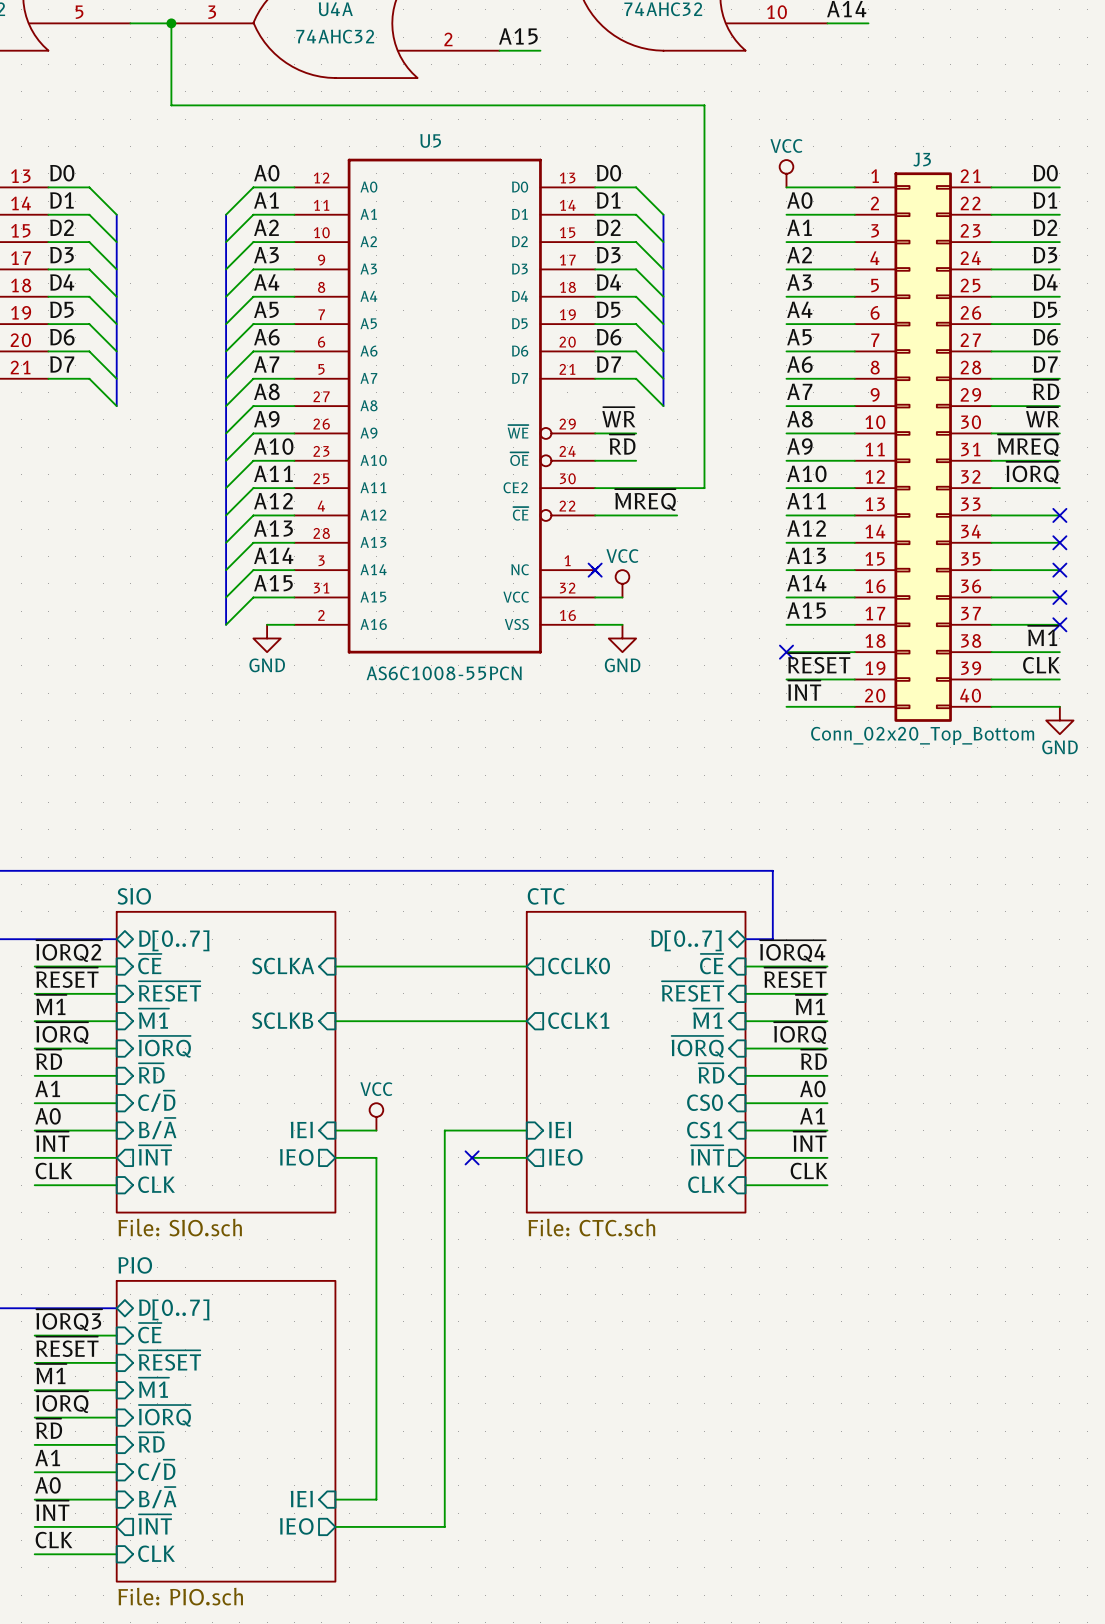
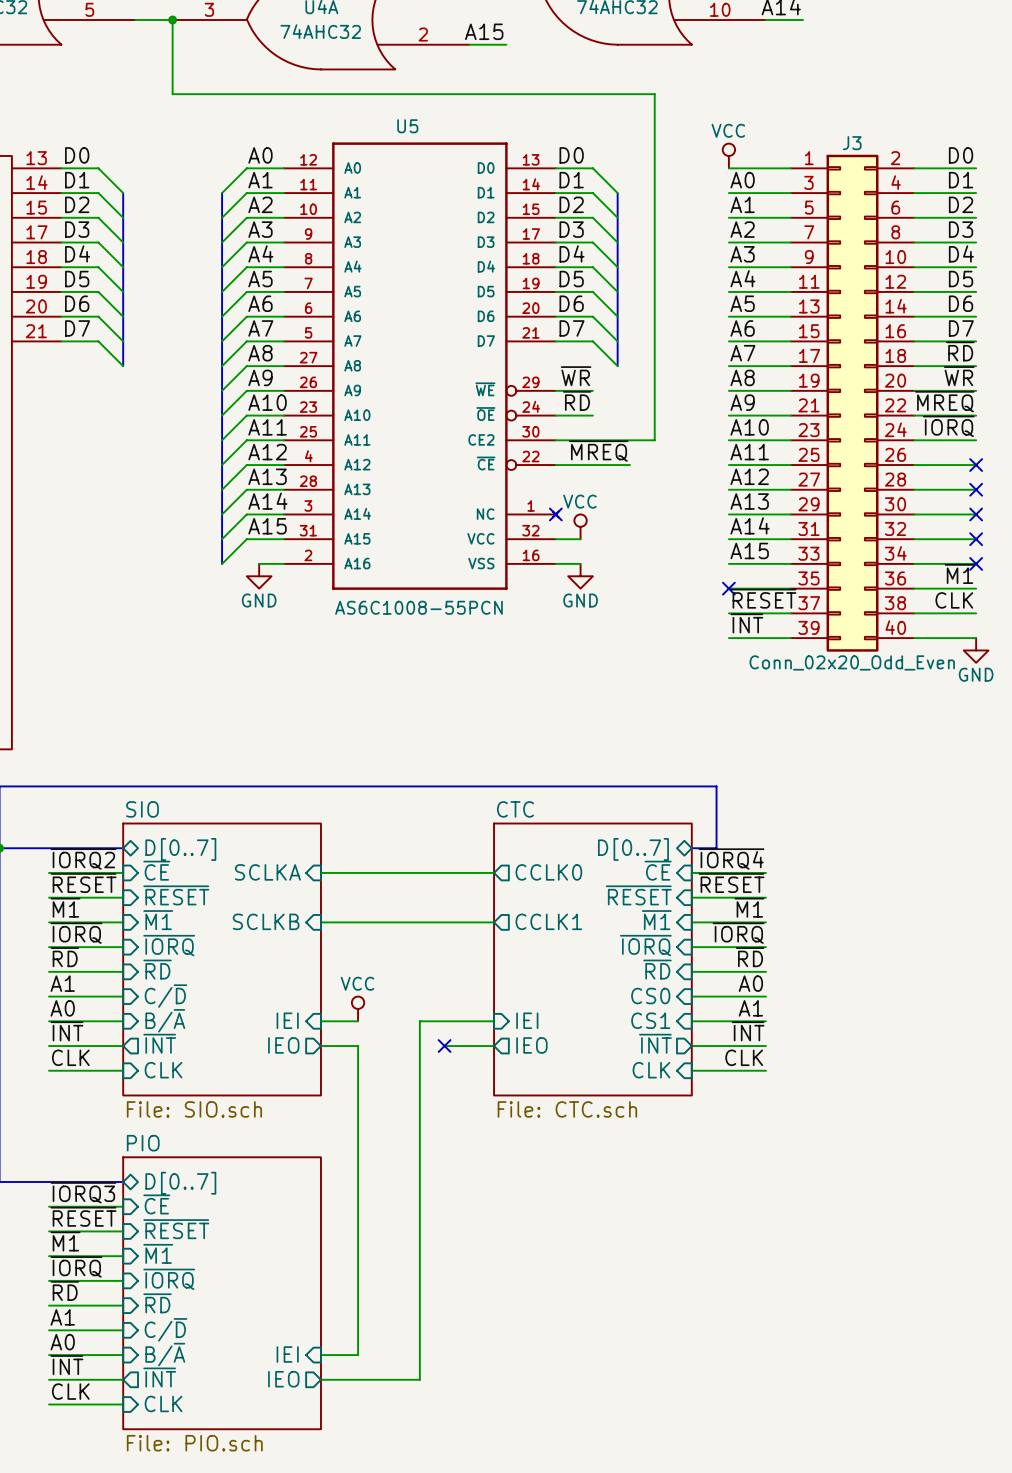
J3 symbol: [854, 172, 992, 722] -> [790, 154, 915, 652]
J3 value: Conn_02x20_Top_Bottom (922, 735) -> Conn_02x20_Odd_Even (852, 662)

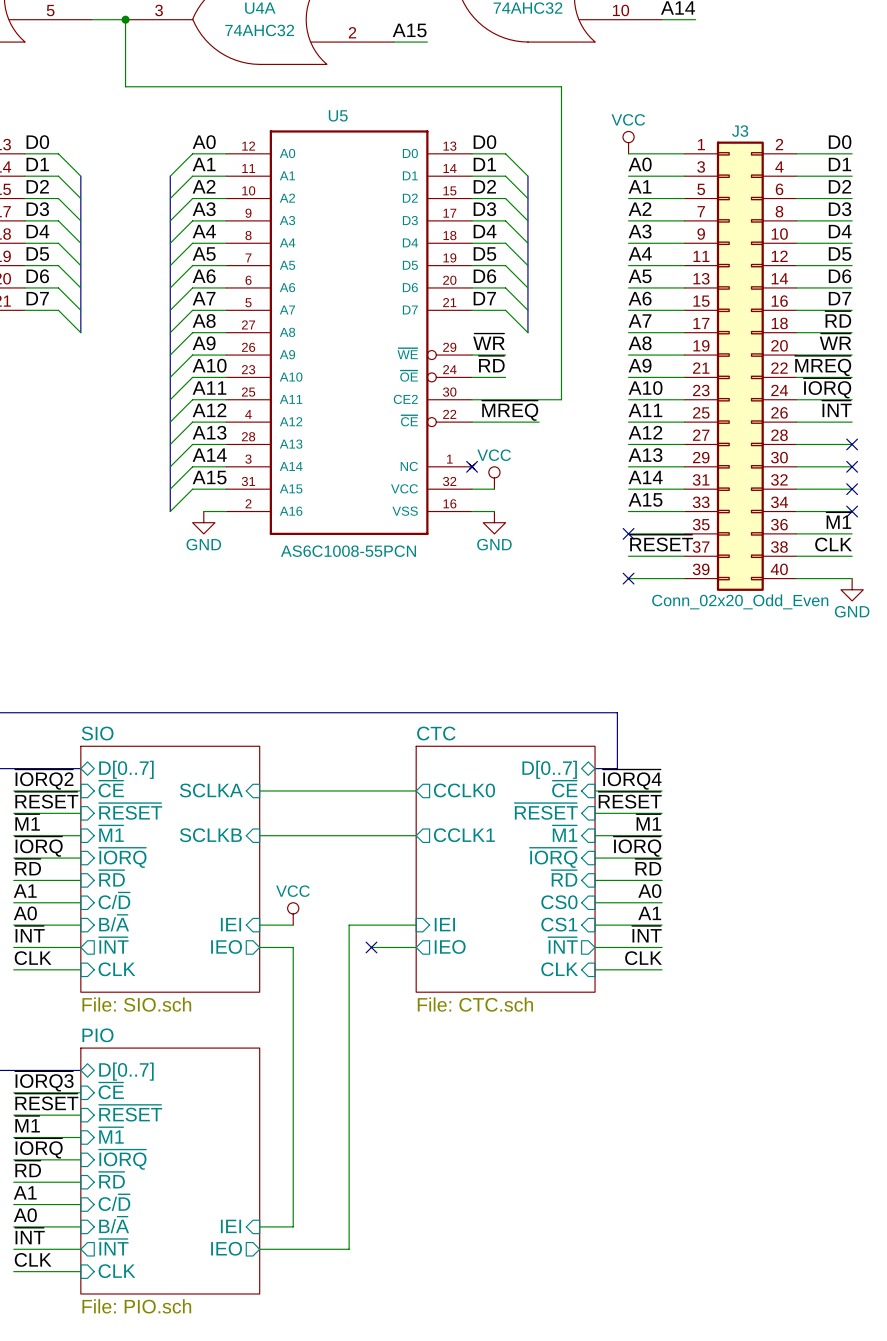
label: none -> ~{INT} (836, 408)
no-connect mark: (976, 465) -> none
label: ~{INT} (746, 623) -> none
no-connect mark: none -> (628, 578)

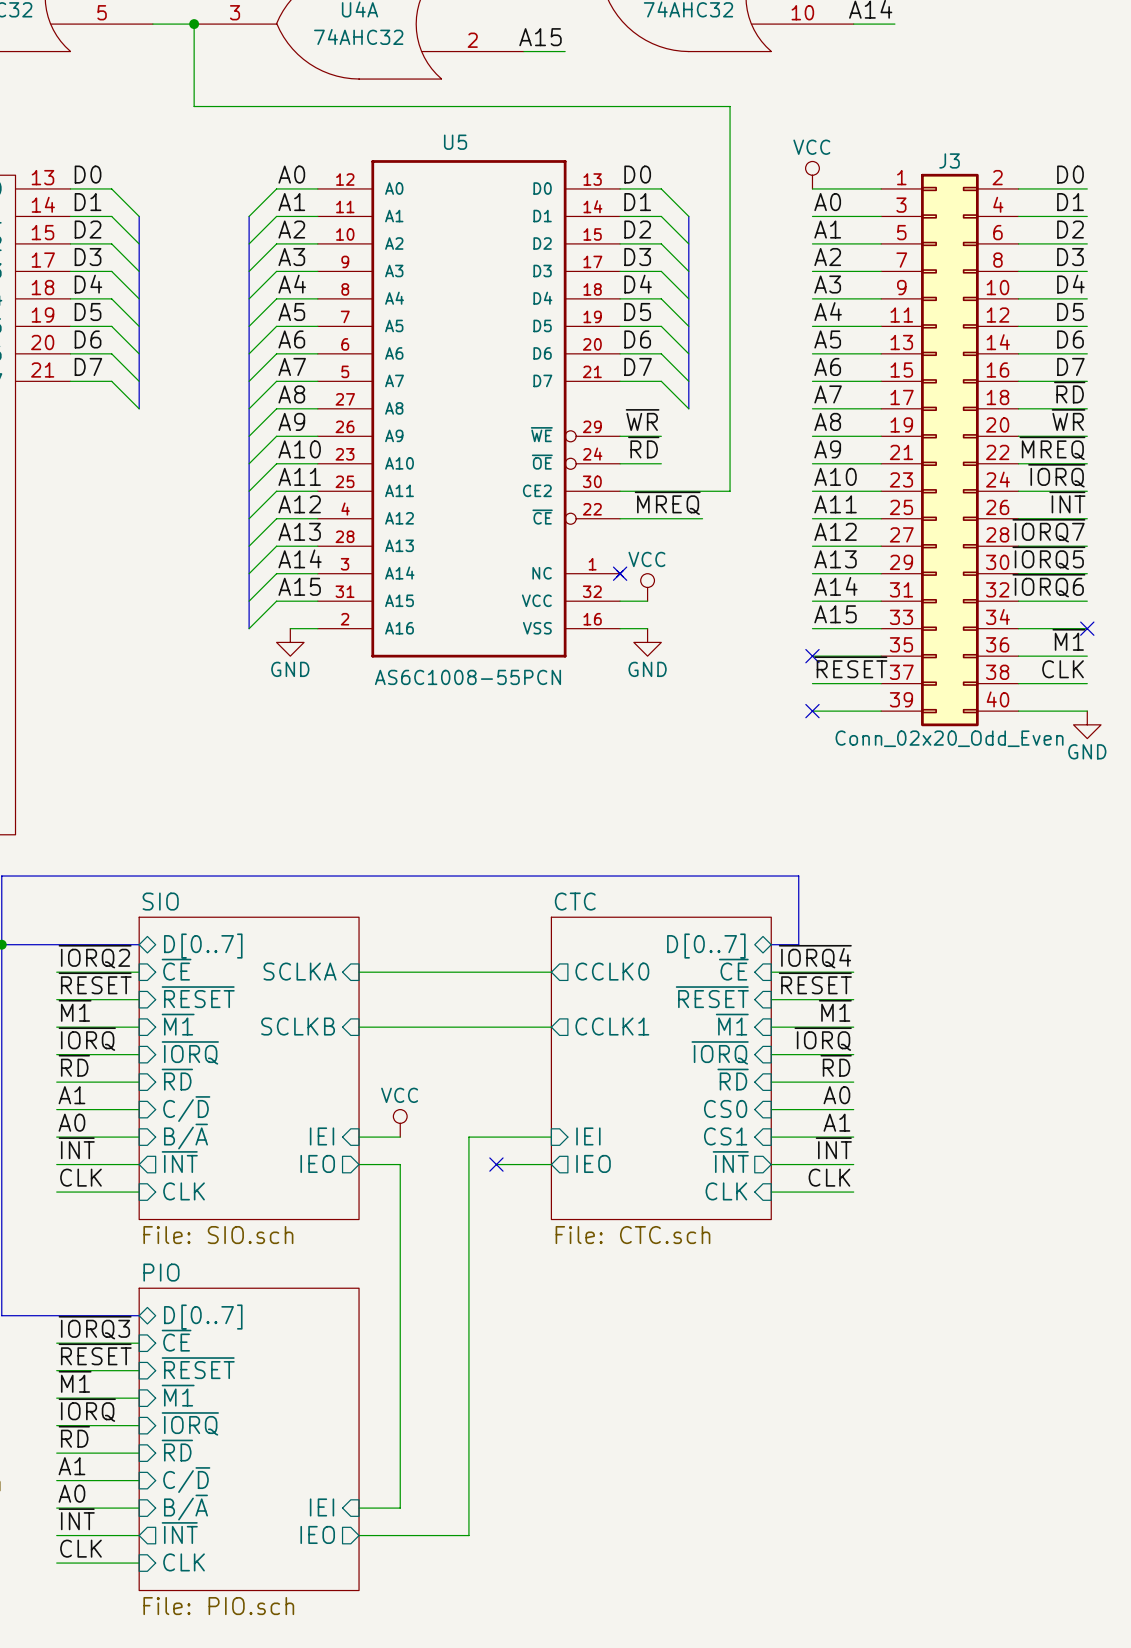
label: none -> ~{IORQ7} (1048, 530)
no-connect mark: (852, 444) -> none
label: none -> ~{IORQ5} (1048, 558)
no-connect mark: (852, 466) -> none
label: none -> ~{IORQ6} (1048, 585)
no-connect mark: (852, 489) -> none

